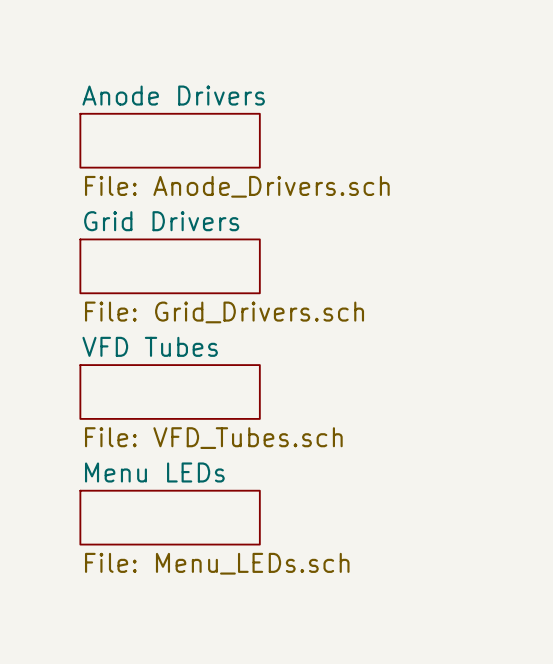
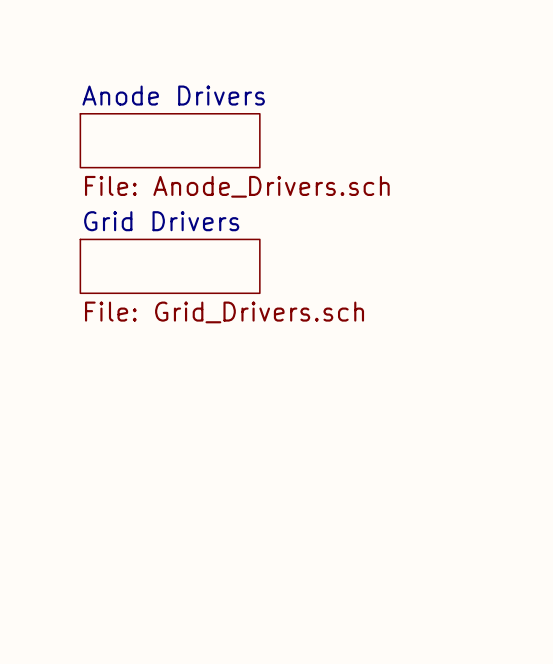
sheet VFD Tubes: File: VFD_Tubes.sch (170, 392) -> none
sheet Menu LEDs: File: Menu_LEDs.sch (170, 517) -> none

